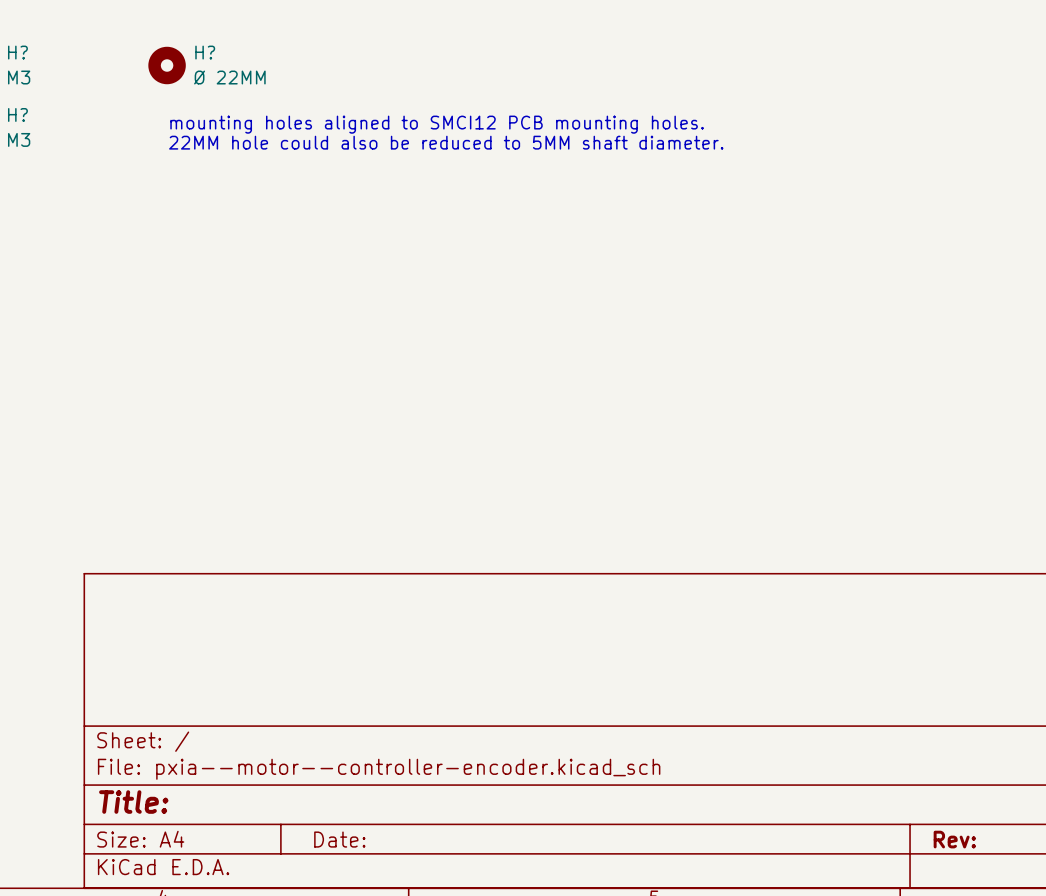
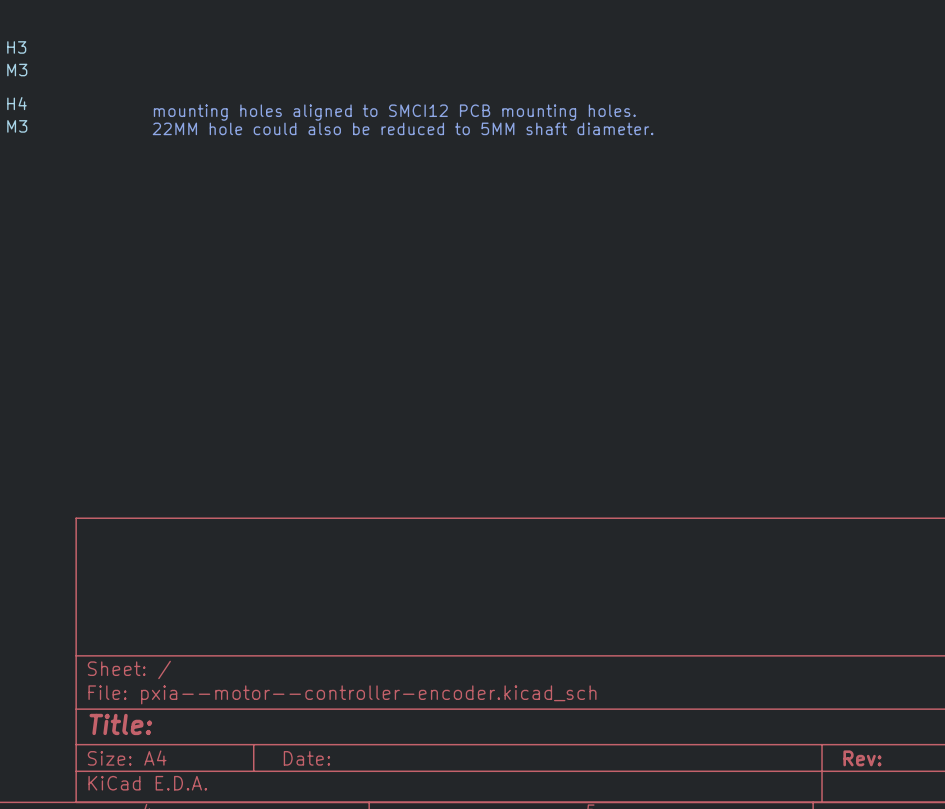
H? name: H? (17, 52) -> H3 (16, 47)
H?: Ø 22MM (167, 65) -> none
H? name: H? (17, 114) -> H4 (17, 103)

